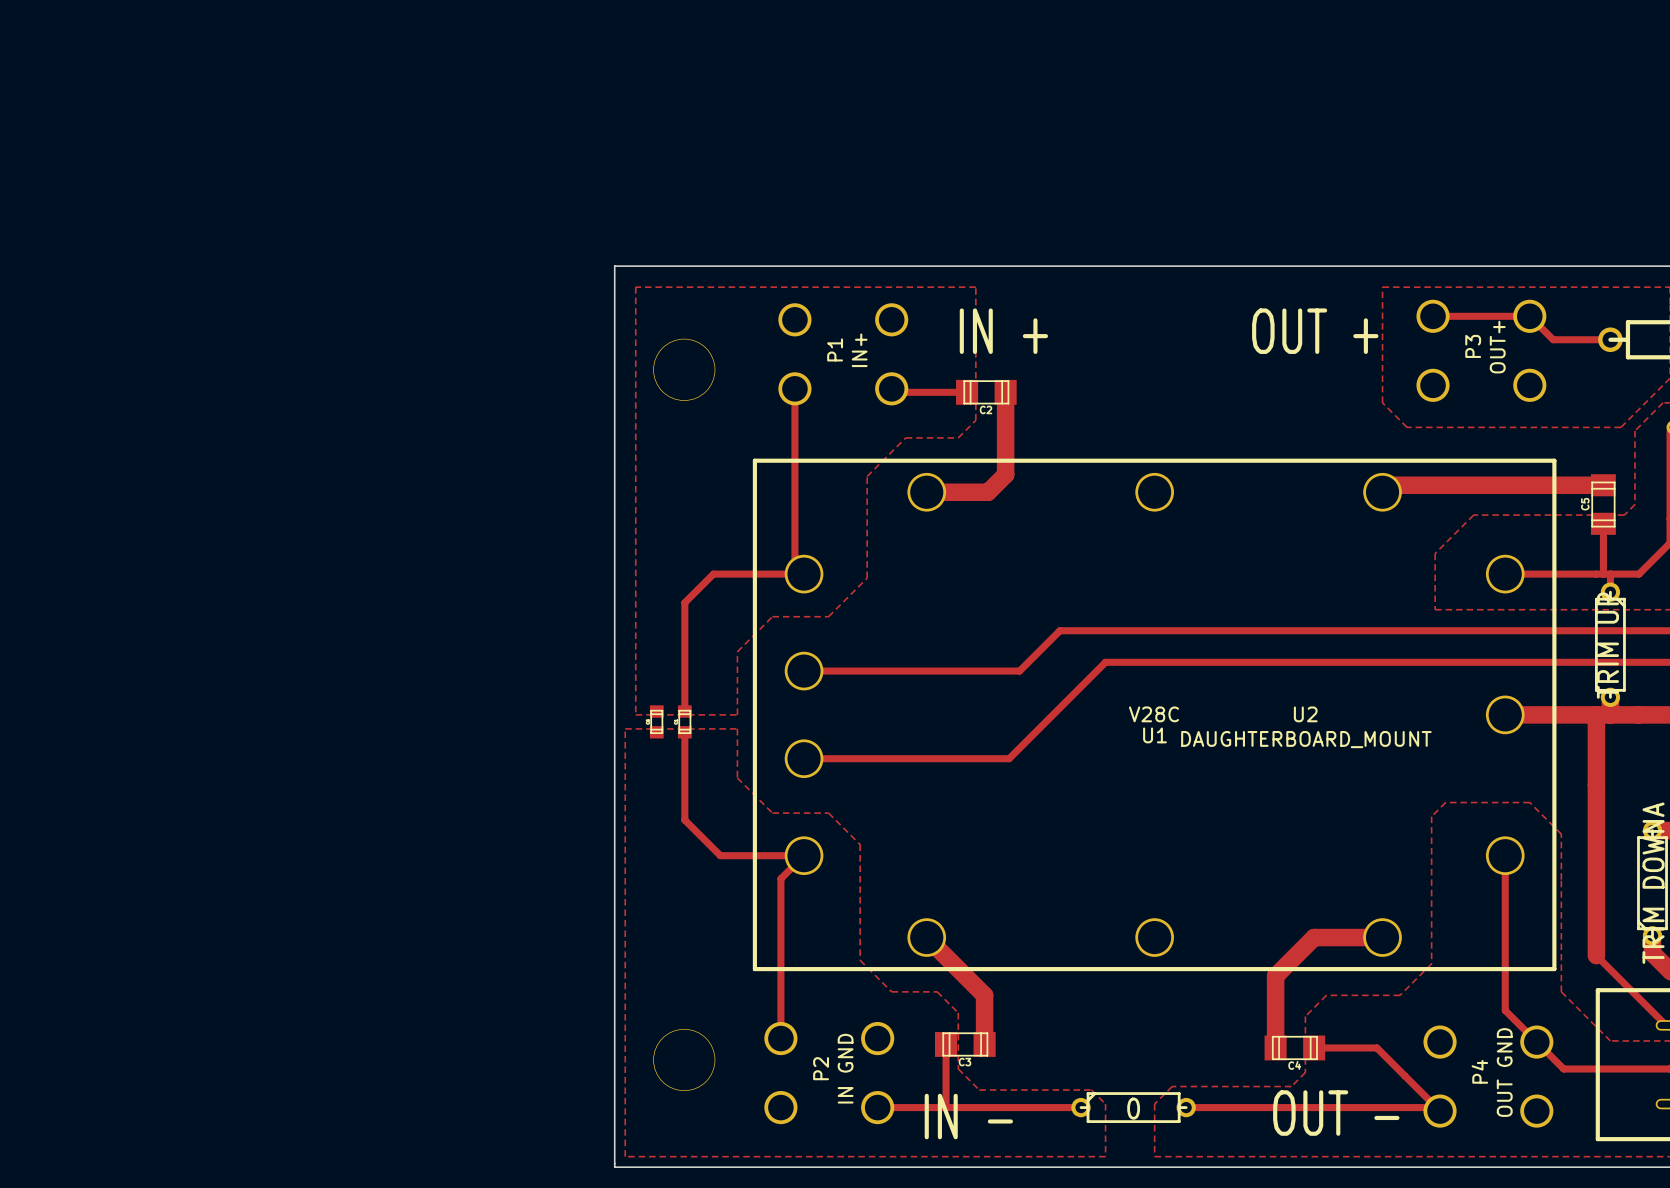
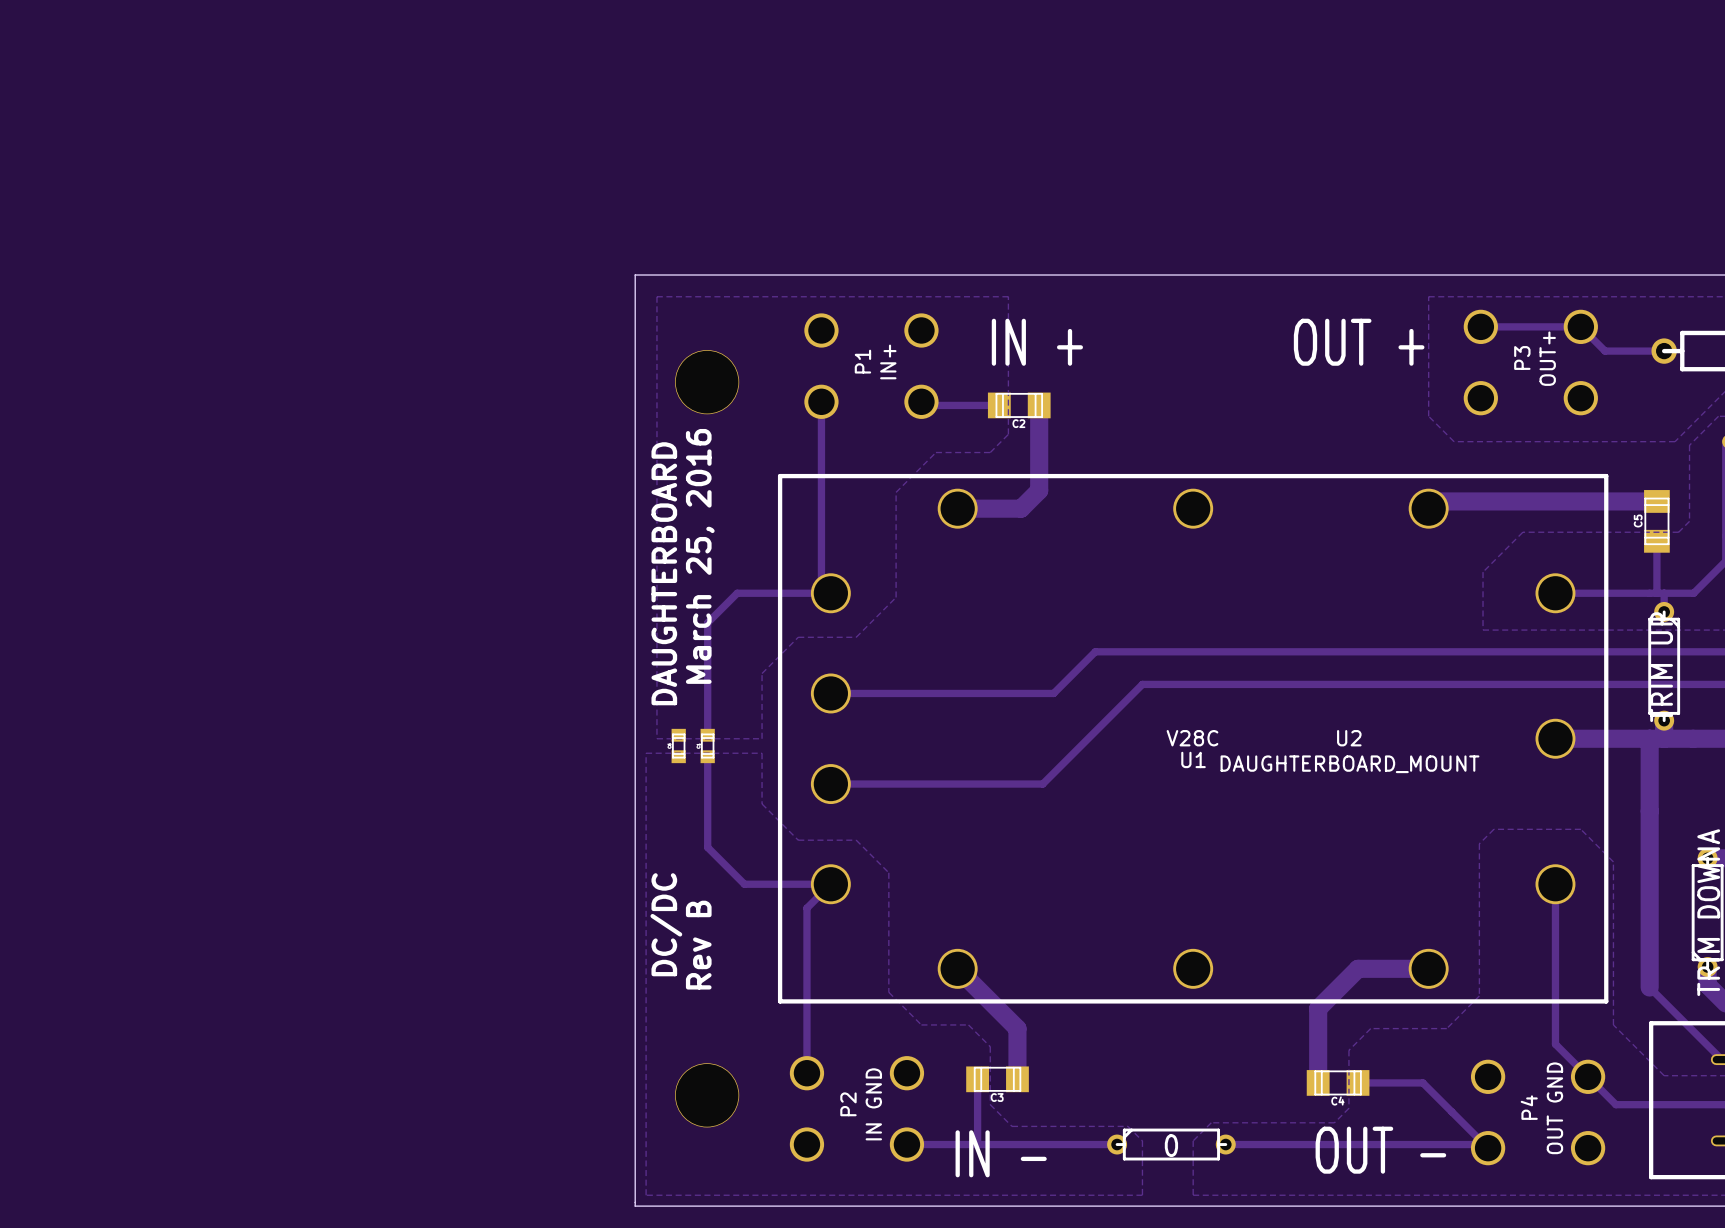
text: none -> DC/DC DAUGHTERBOARD (666, 709)
text: none -> Rev B March 25, 2016 (700, 709)

